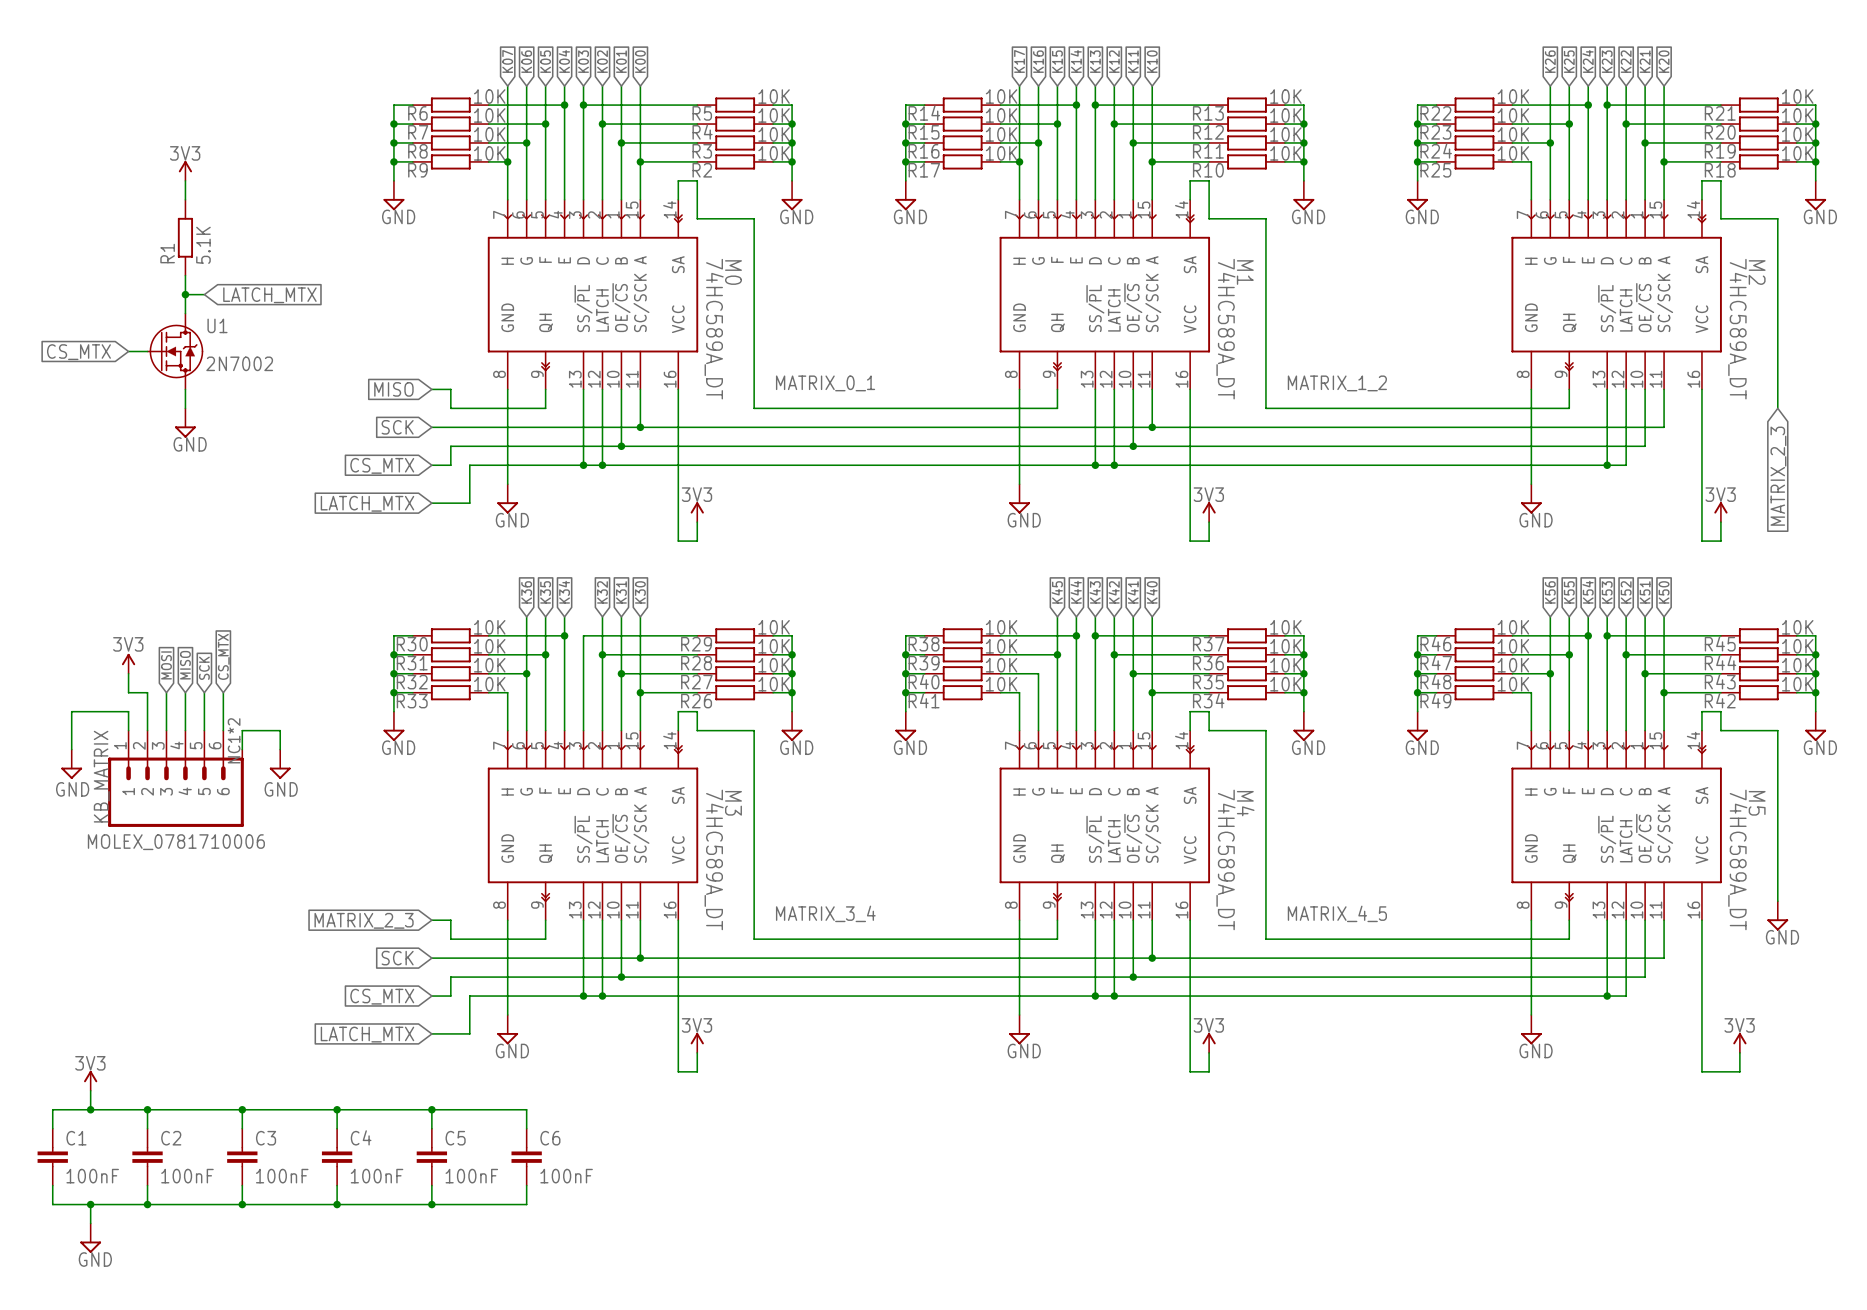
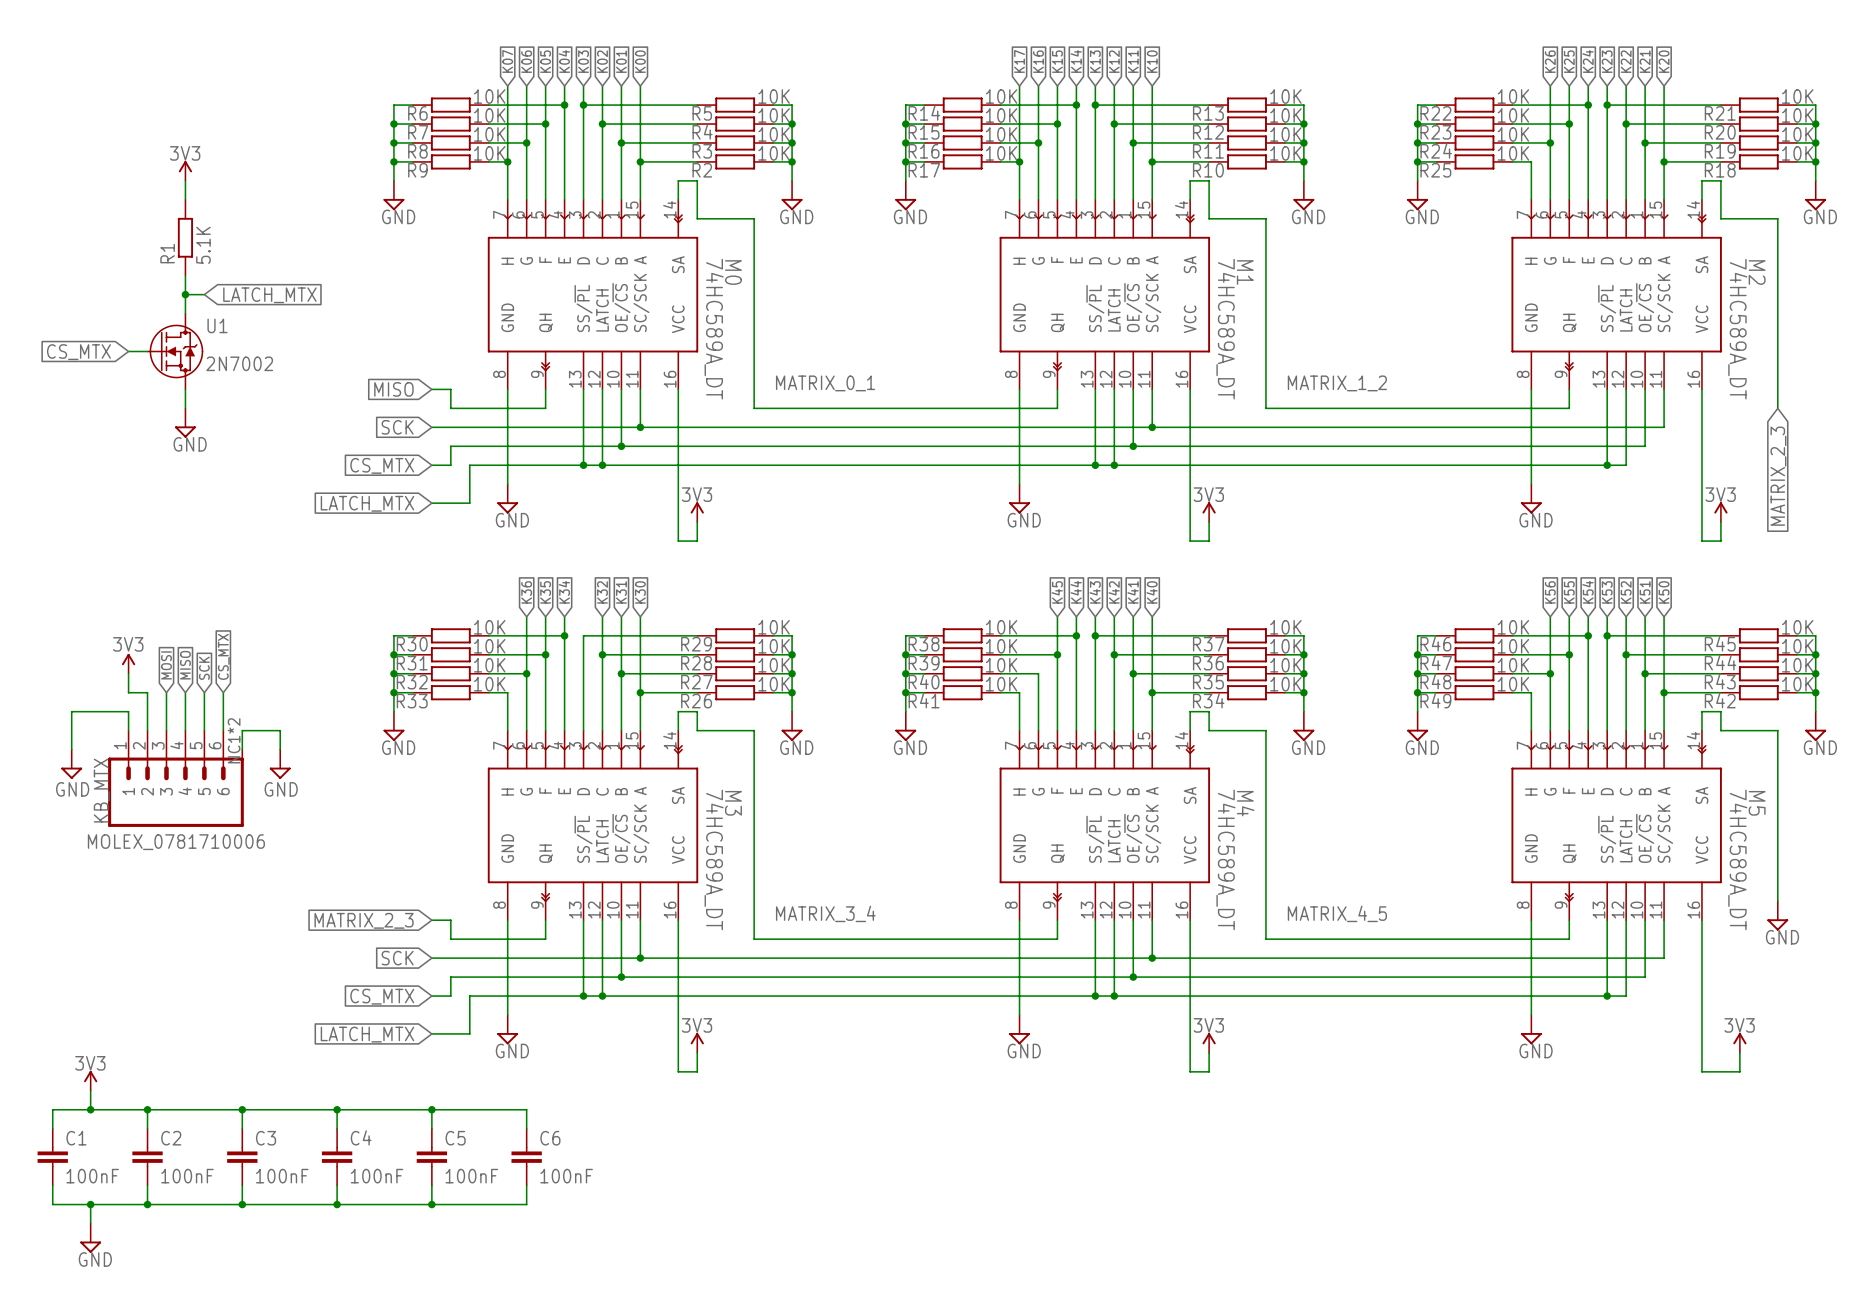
KB_MATRIX name: KB_MATRIX (101, 776) -> KB_MTX (101, 790)

